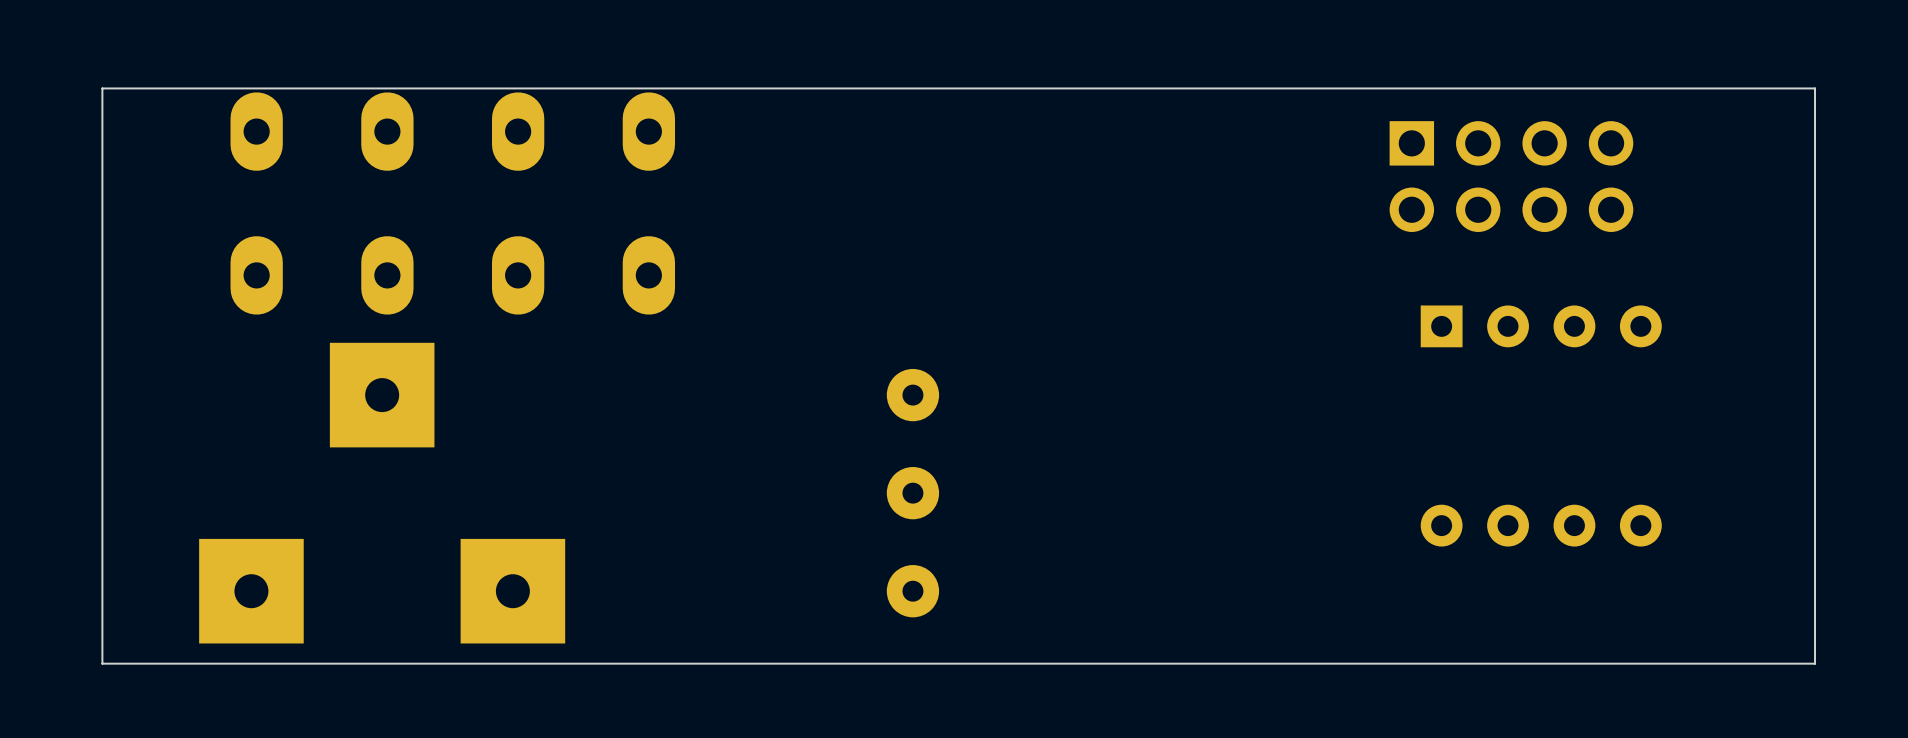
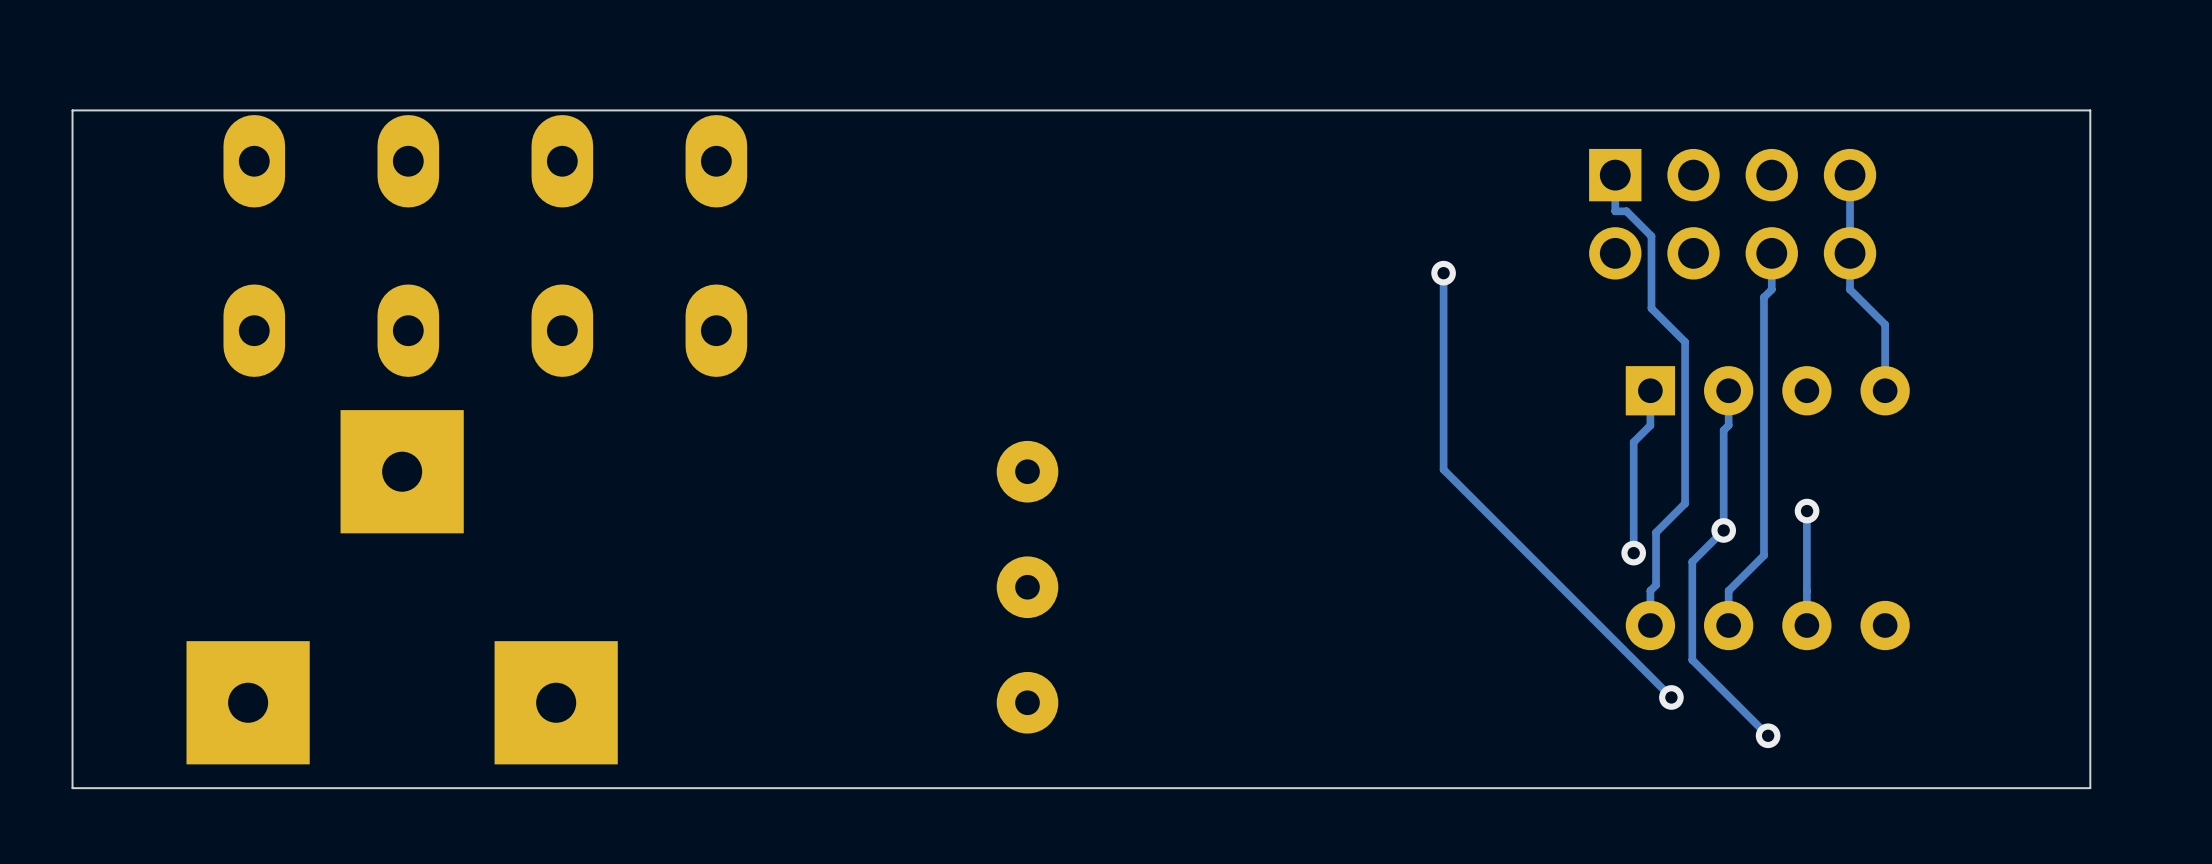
track: none -> (1615, 175) (1615, 211) (1626, 211) (1651, 236) (1651, 308) (1685, 342) (1685, 503) (1656, 532) (1656, 585) (1650, 590) (1650, 625)
track: none -> (1850, 175) (1850, 289) (1885, 324) (1885, 390)
track: none -> (1771, 253) (1771, 289) (1763, 297) (1763, 555) (1728, 590) (1728, 625)
track: none -> (1443, 273) (1443, 469) (1671, 697)
via: none -> (1443, 273)
track: none -> (1650, 390) (1650, 425) (1633, 442) (1633, 553)
track: none -> (1728, 390) (1728, 425) (1723, 430) (1723, 530) (1692, 561) (1692, 659) (1768, 735)
track: none -> (1806, 511) (1806, 625)
via: none -> (1807, 511)
via: none -> (1723, 530)
via: none -> (1633, 553)
via: none -> (1671, 697)
via: none -> (1768, 735)

